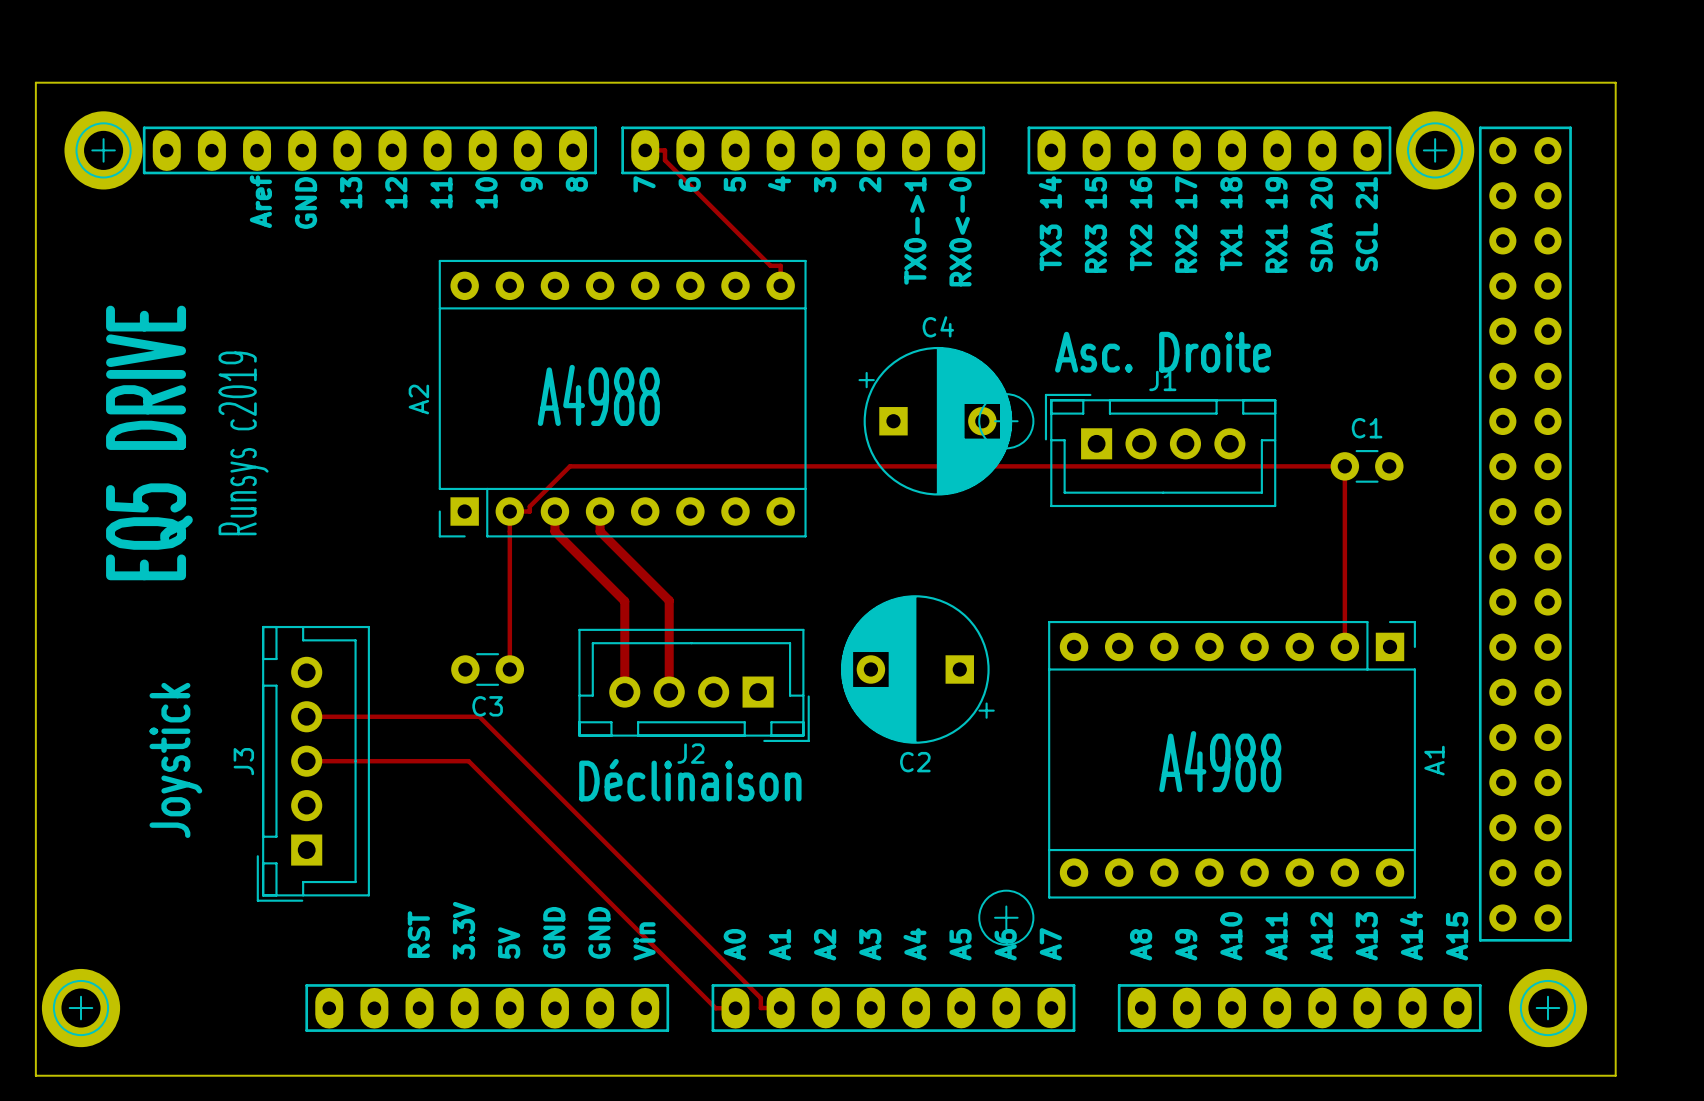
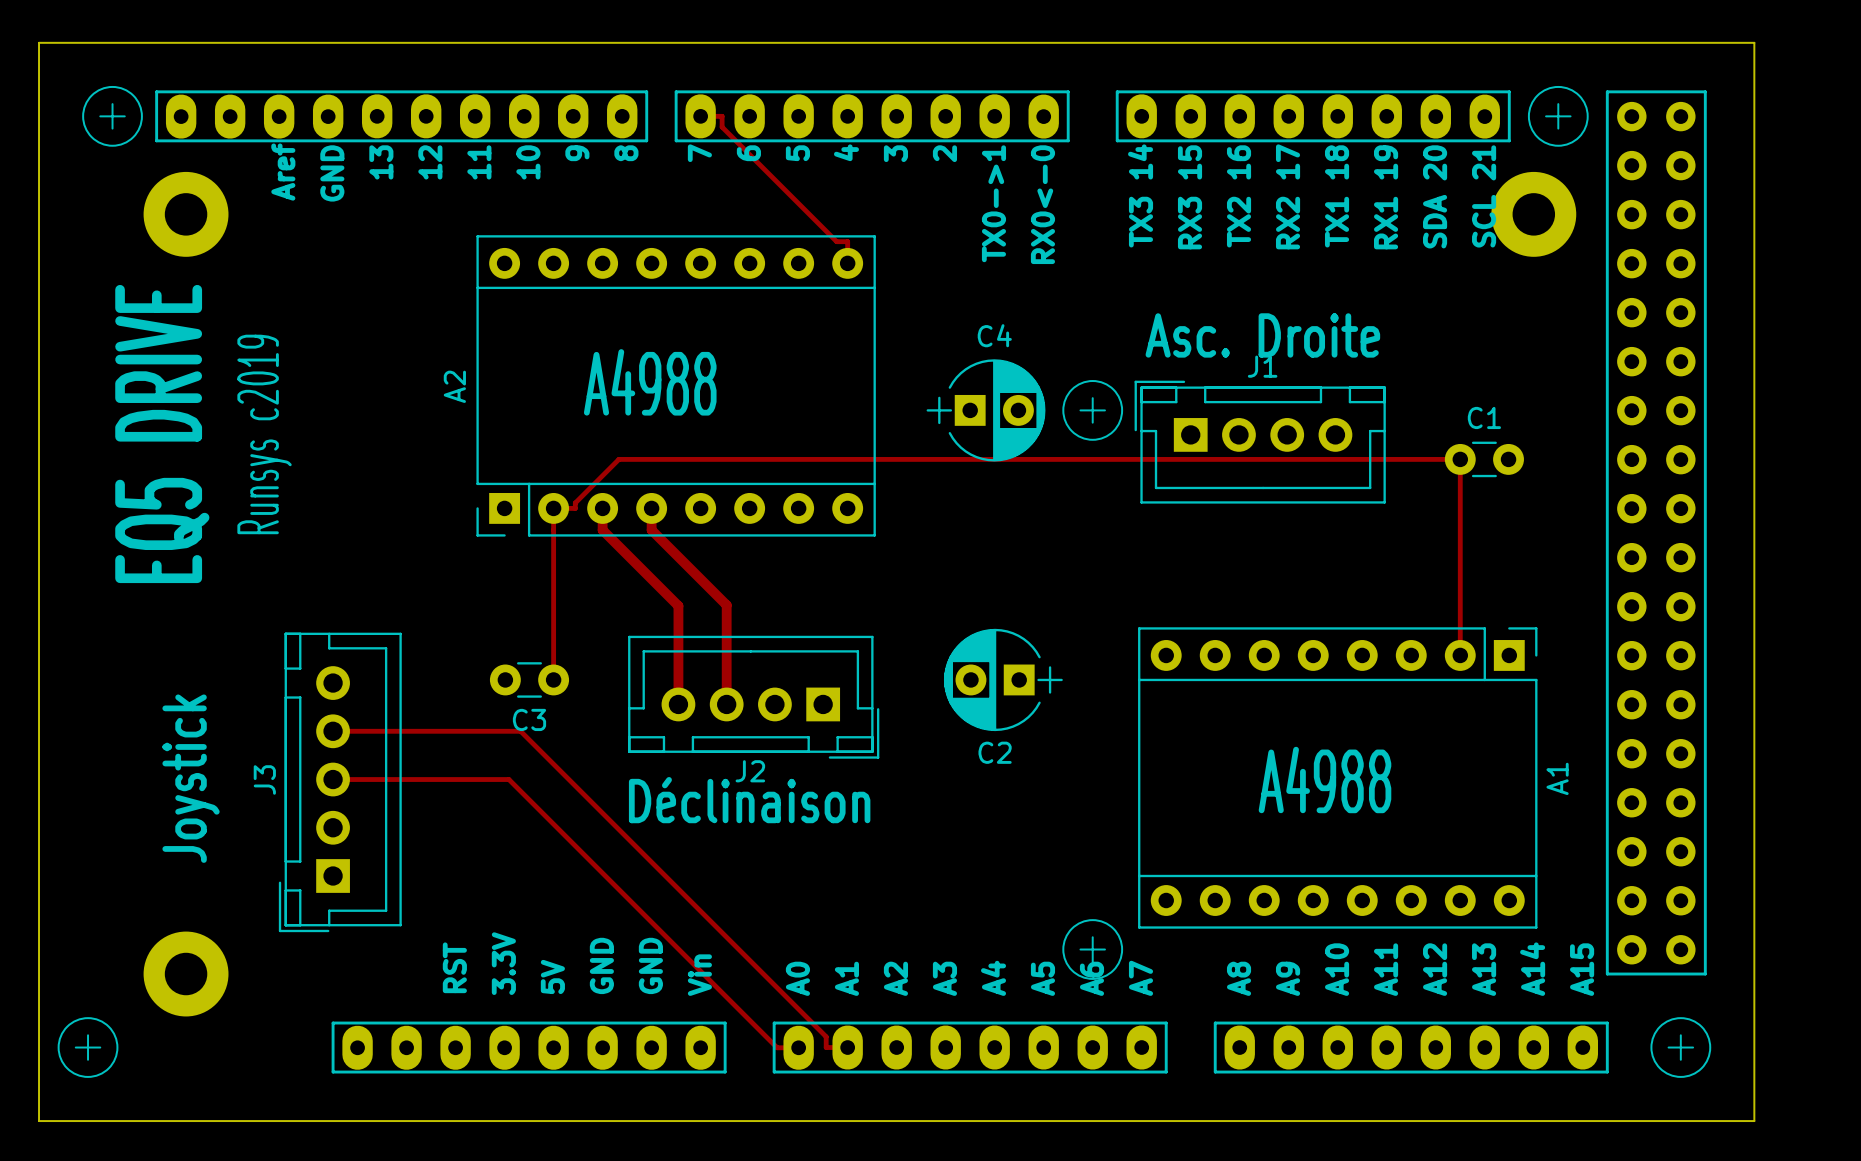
part position: (103, 150) -> (186, 214)
part position: (1435, 150) -> (1533, 214)
C4 footprint: [858, 346, 1013, 496] -> [926, 359, 1046, 462]
C2 footprint: [841, 595, 995, 744] -> [943, 628, 1063, 732]
part position: (81, 1008) -> (186, 974)
part: (1547, 1008) -> none

